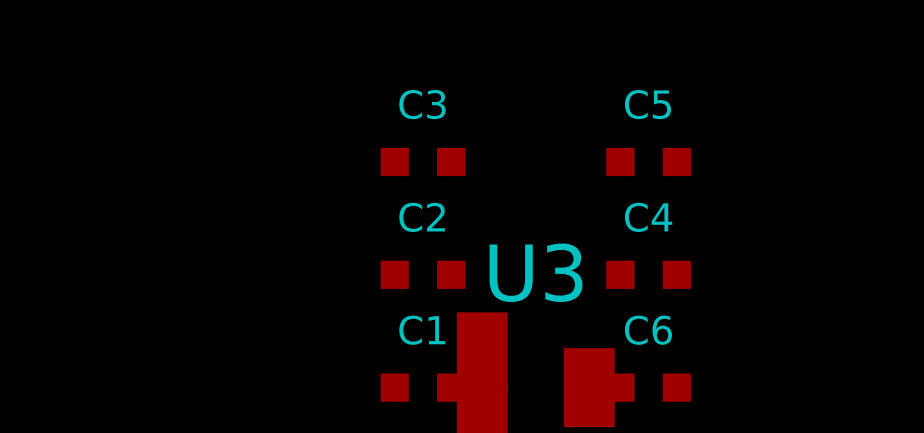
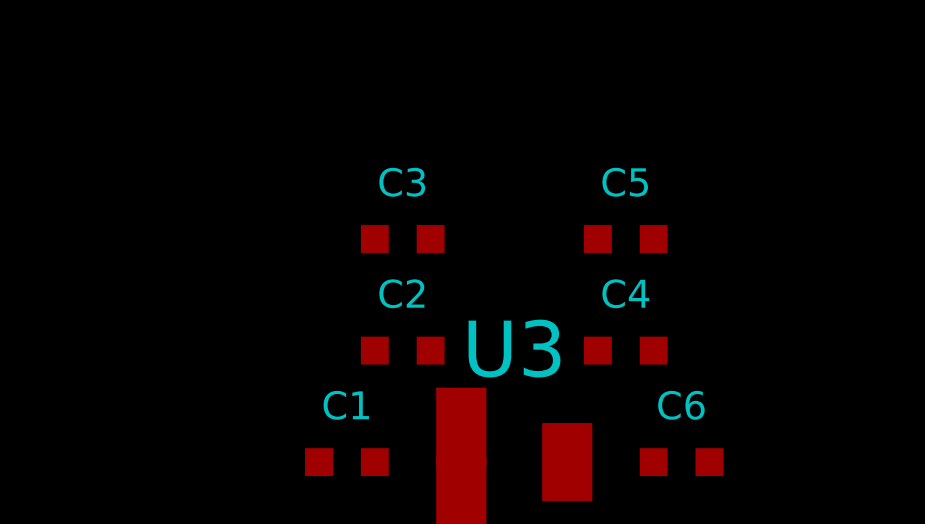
C1 position: (422, 387) -> (346, 462)
C6 position: (648, 387) -> (681, 462)

